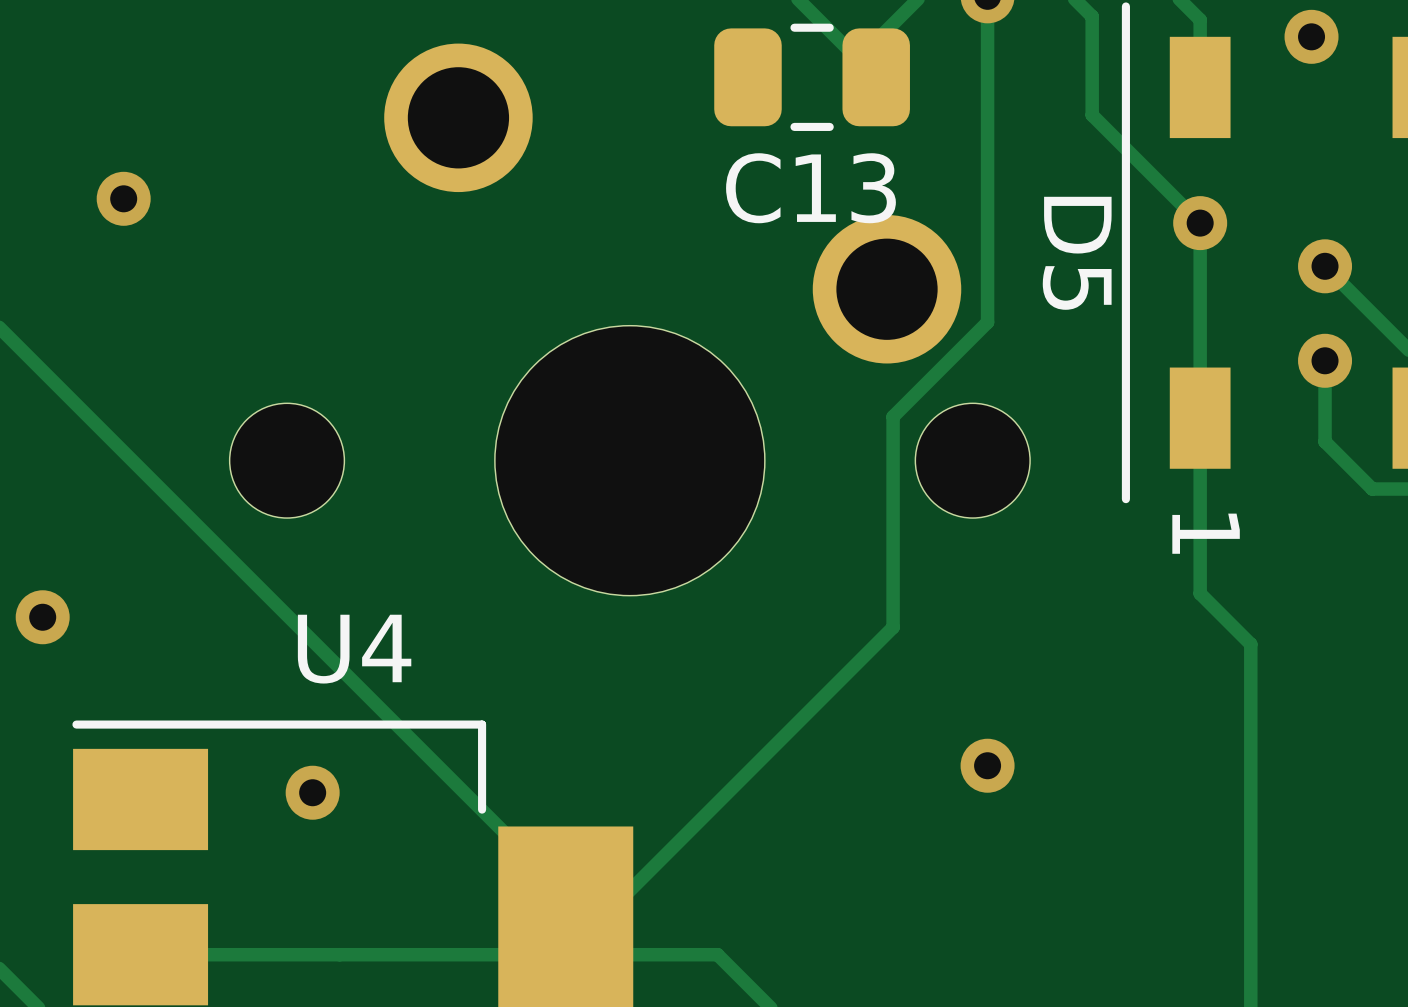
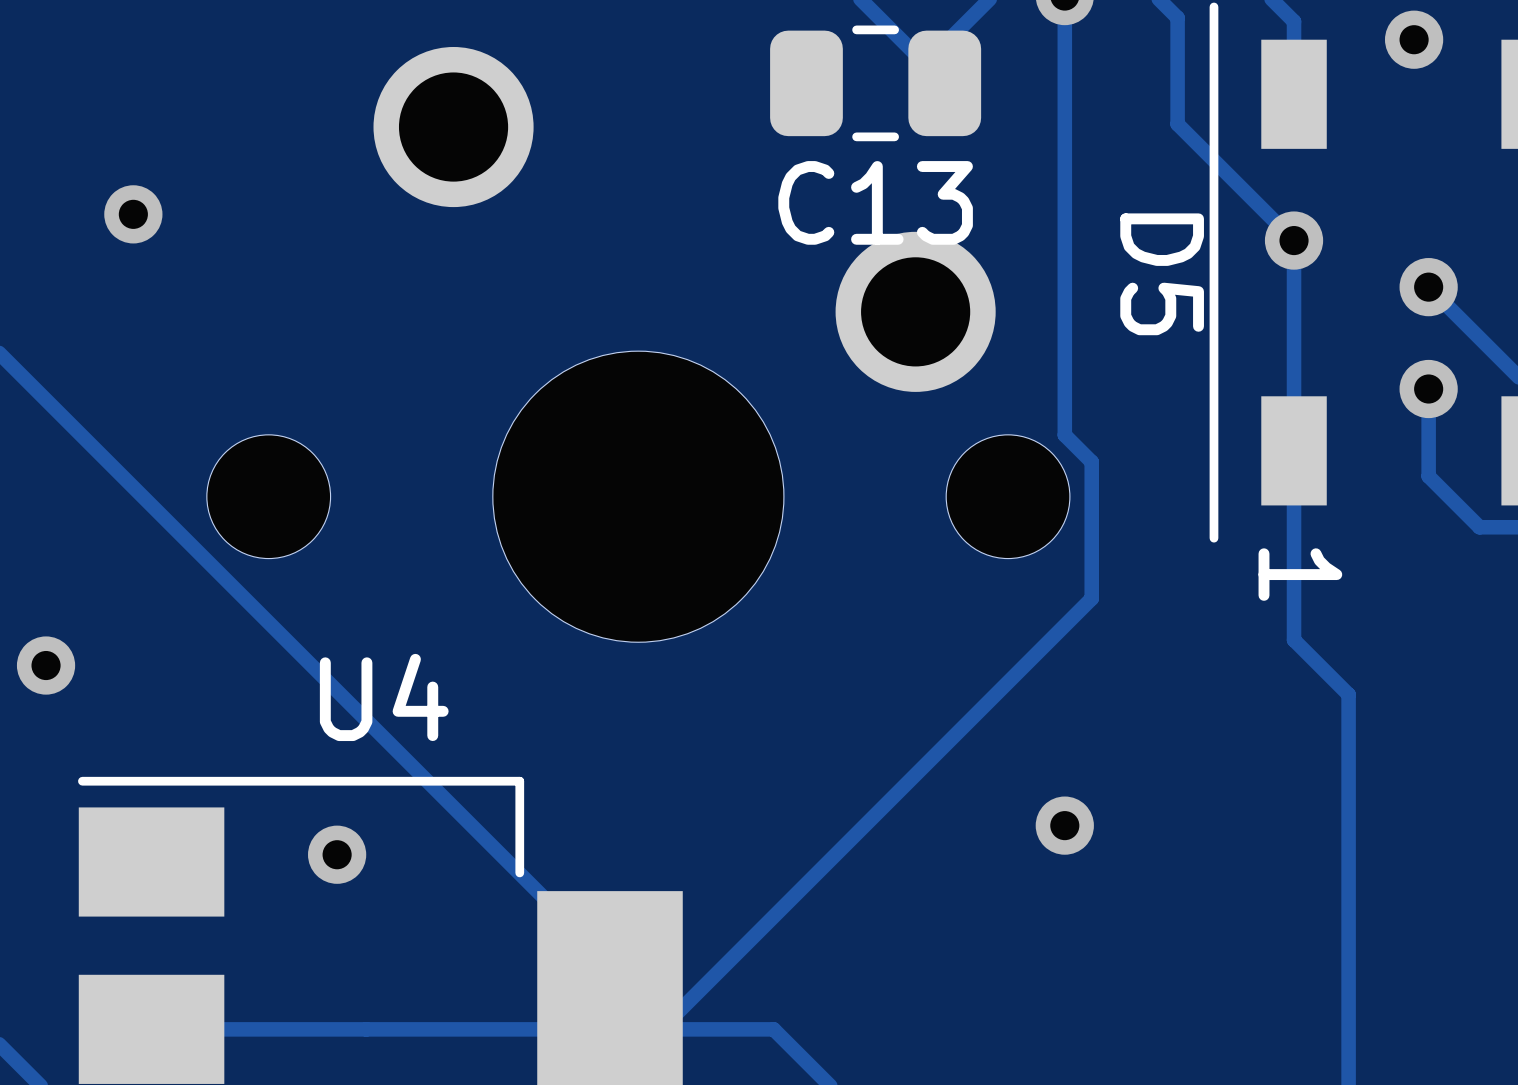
part position: (629, 319) -> (638, 344)
track: (987, 322) (893, 416) (893, 627) (565, 954) -> (1064, 347) (1064, 435) (1091, 462) (1091, 598) (660, 1029)

